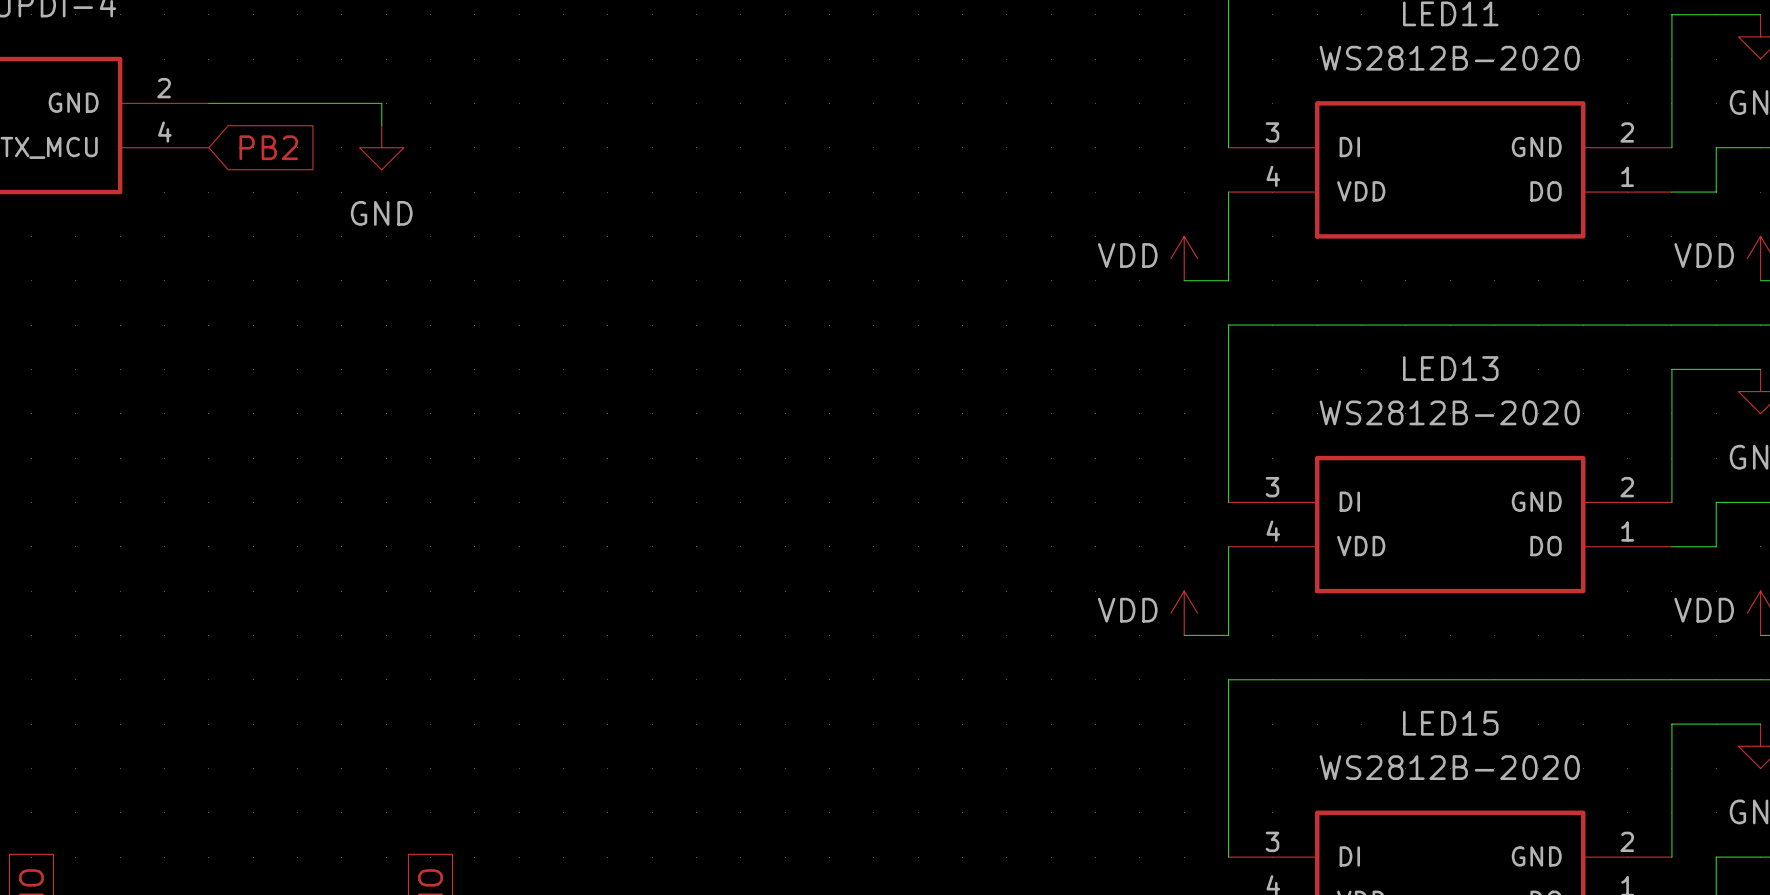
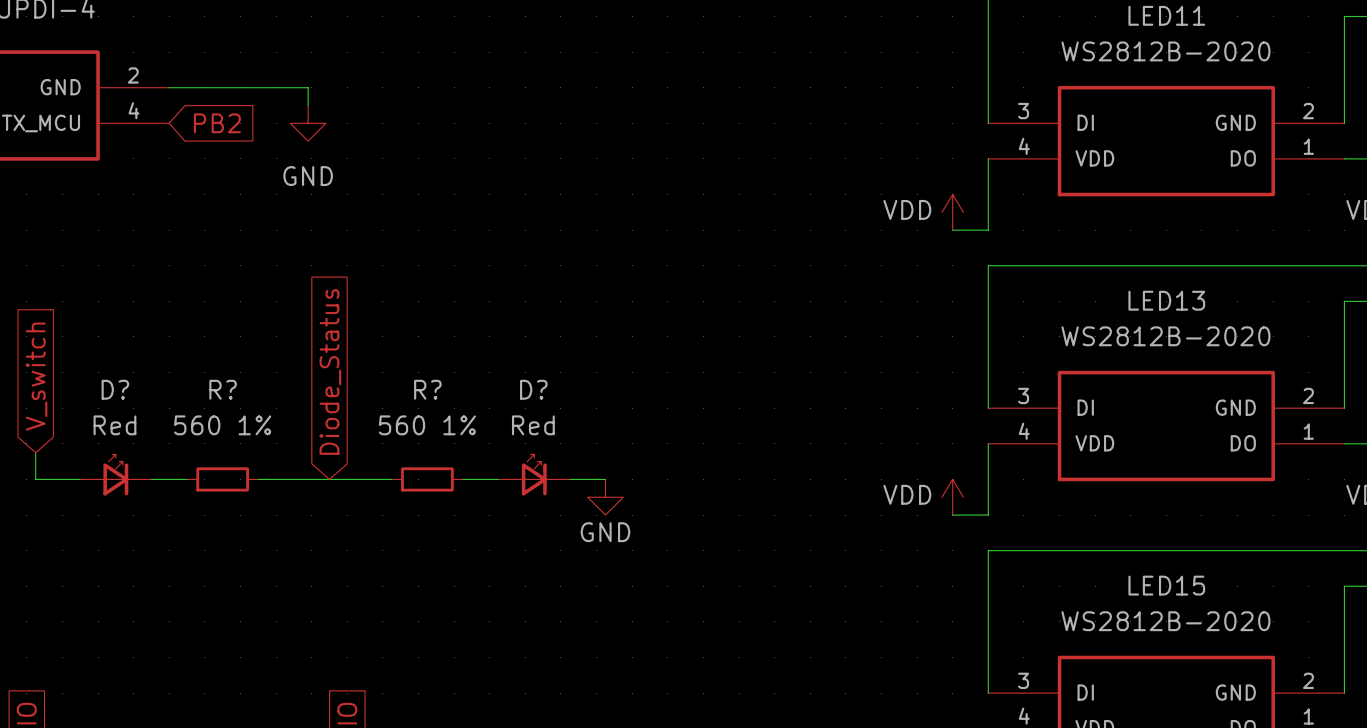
global label: none -> Diode_Status (330, 371)
global label: none -> V_switch (36, 376)
wire: none -> (35, 452) (35, 479) (80, 479)
D?: none -> Red (115, 474)
D?: none -> Red (534, 474)
wire: none -> (151, 479) (187, 479)
R?: none -> 560 1% (222, 479)
wire: none -> (258, 479) (391, 479)
R?: none -> 560 1% (427, 479)
wire: none -> (463, 479) (498, 479)
wire: none -> (569, 479) (605, 479)
power symbol: none -> GND (605, 497)

